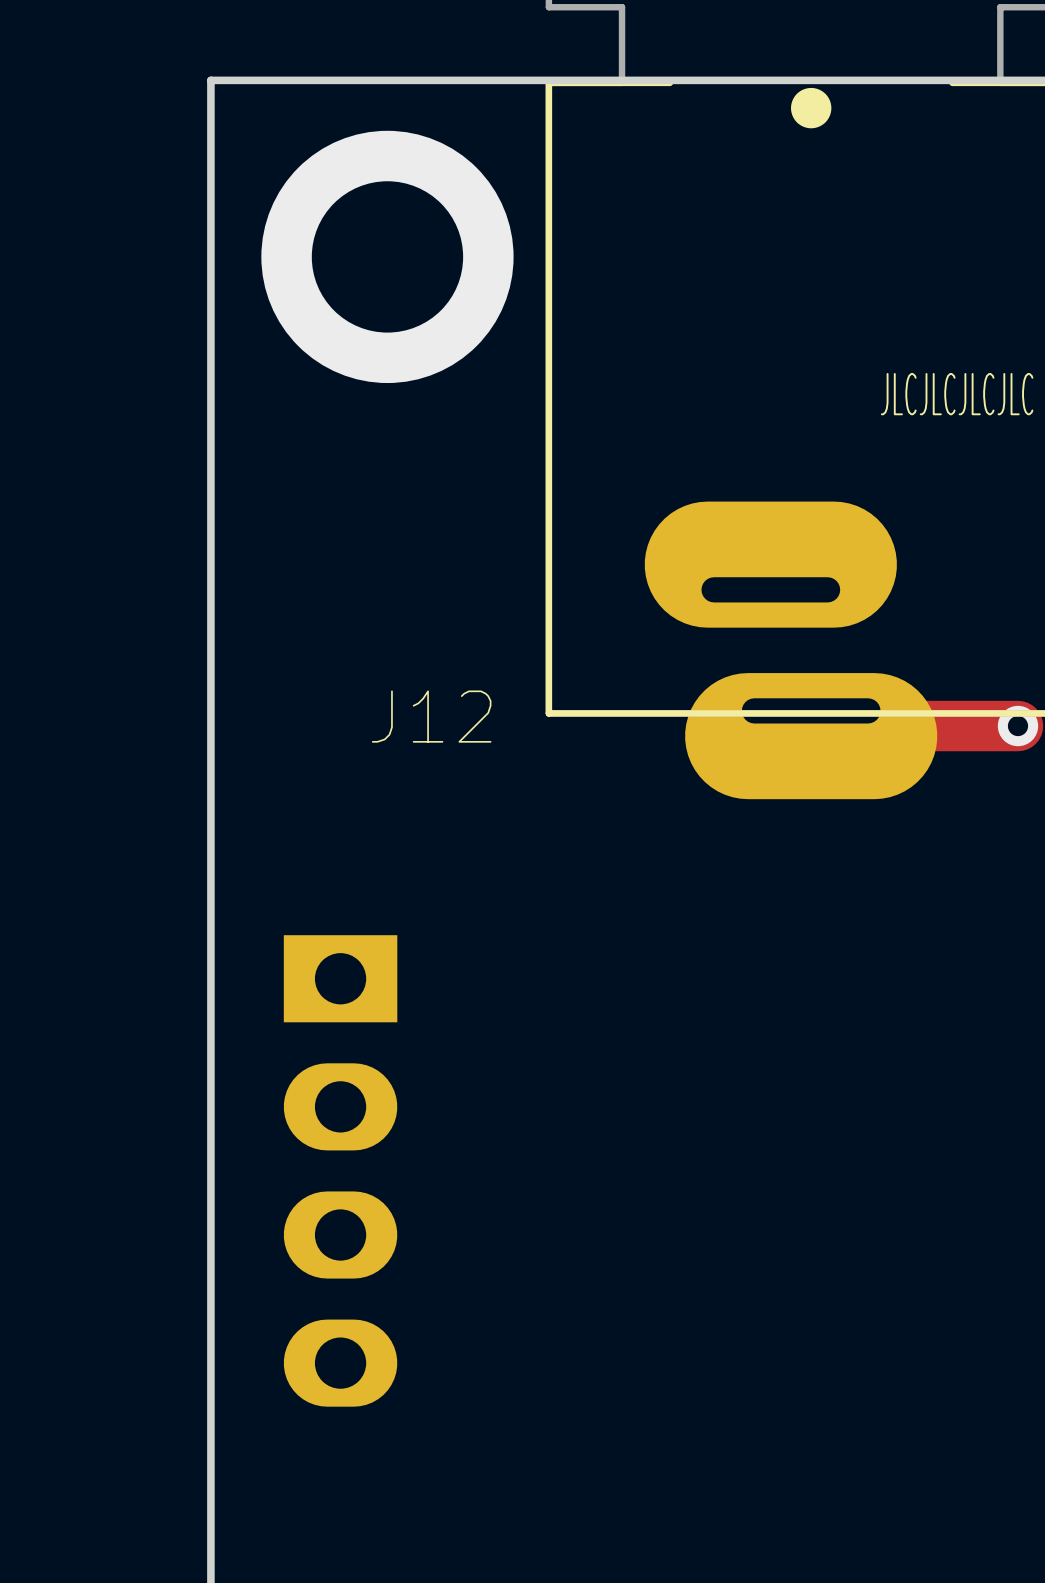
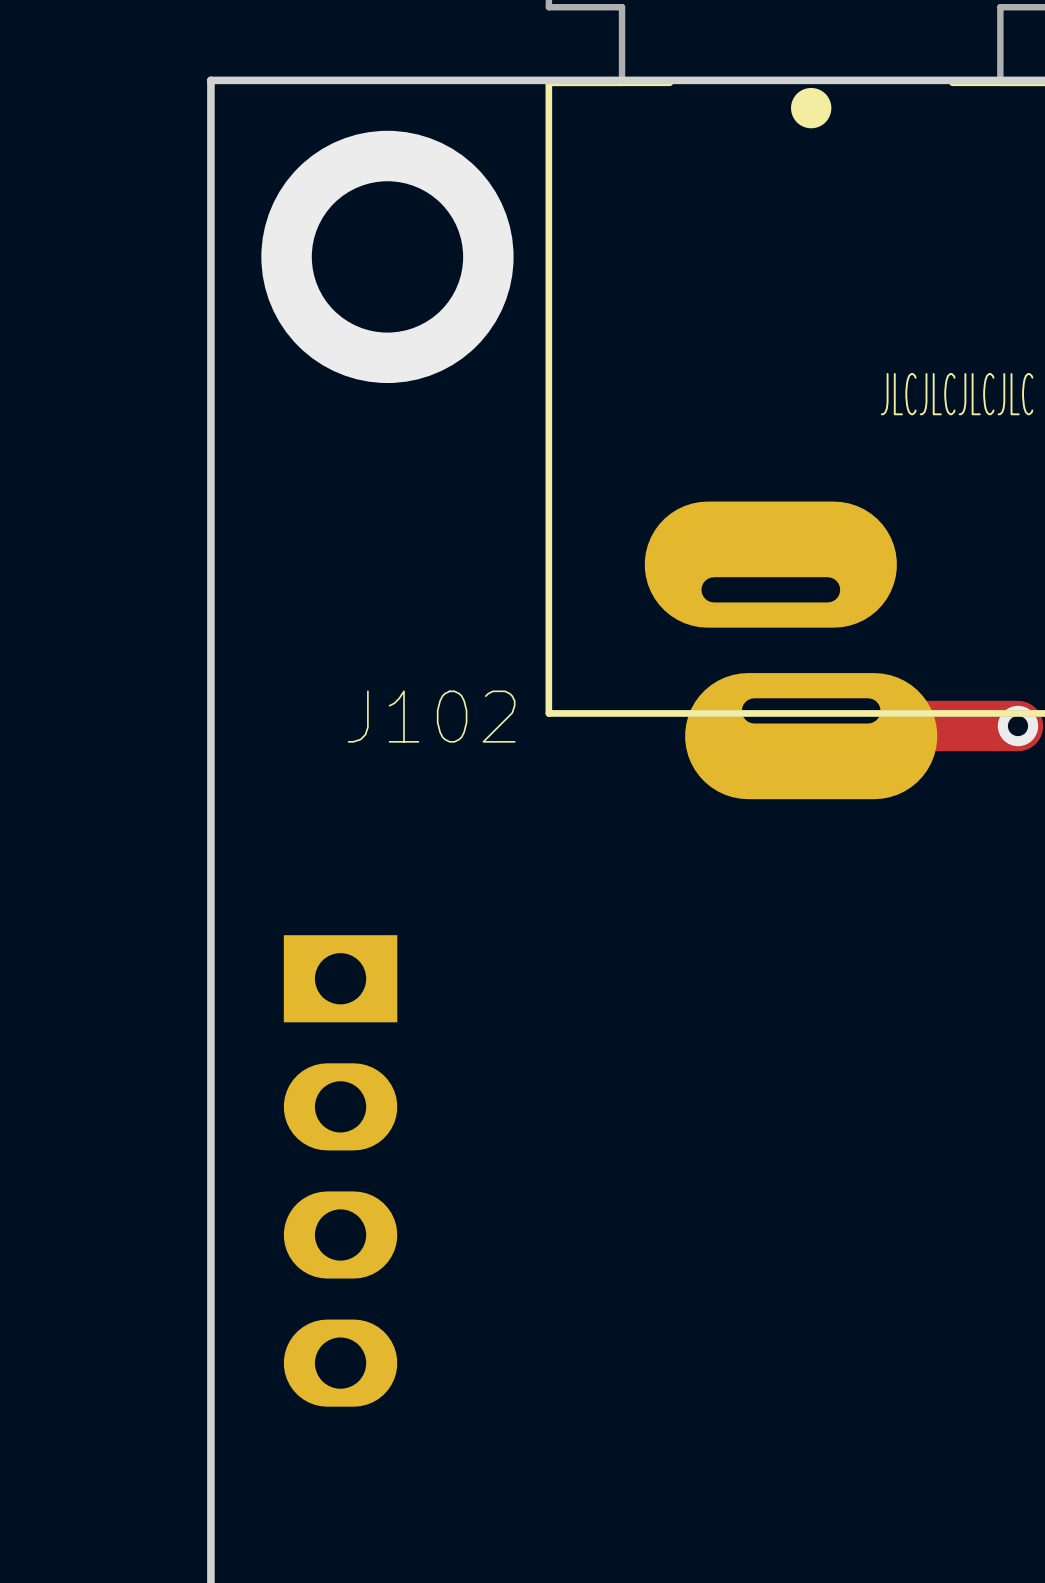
J12 name: J12 (431, 716) -> J102 (431, 716)

